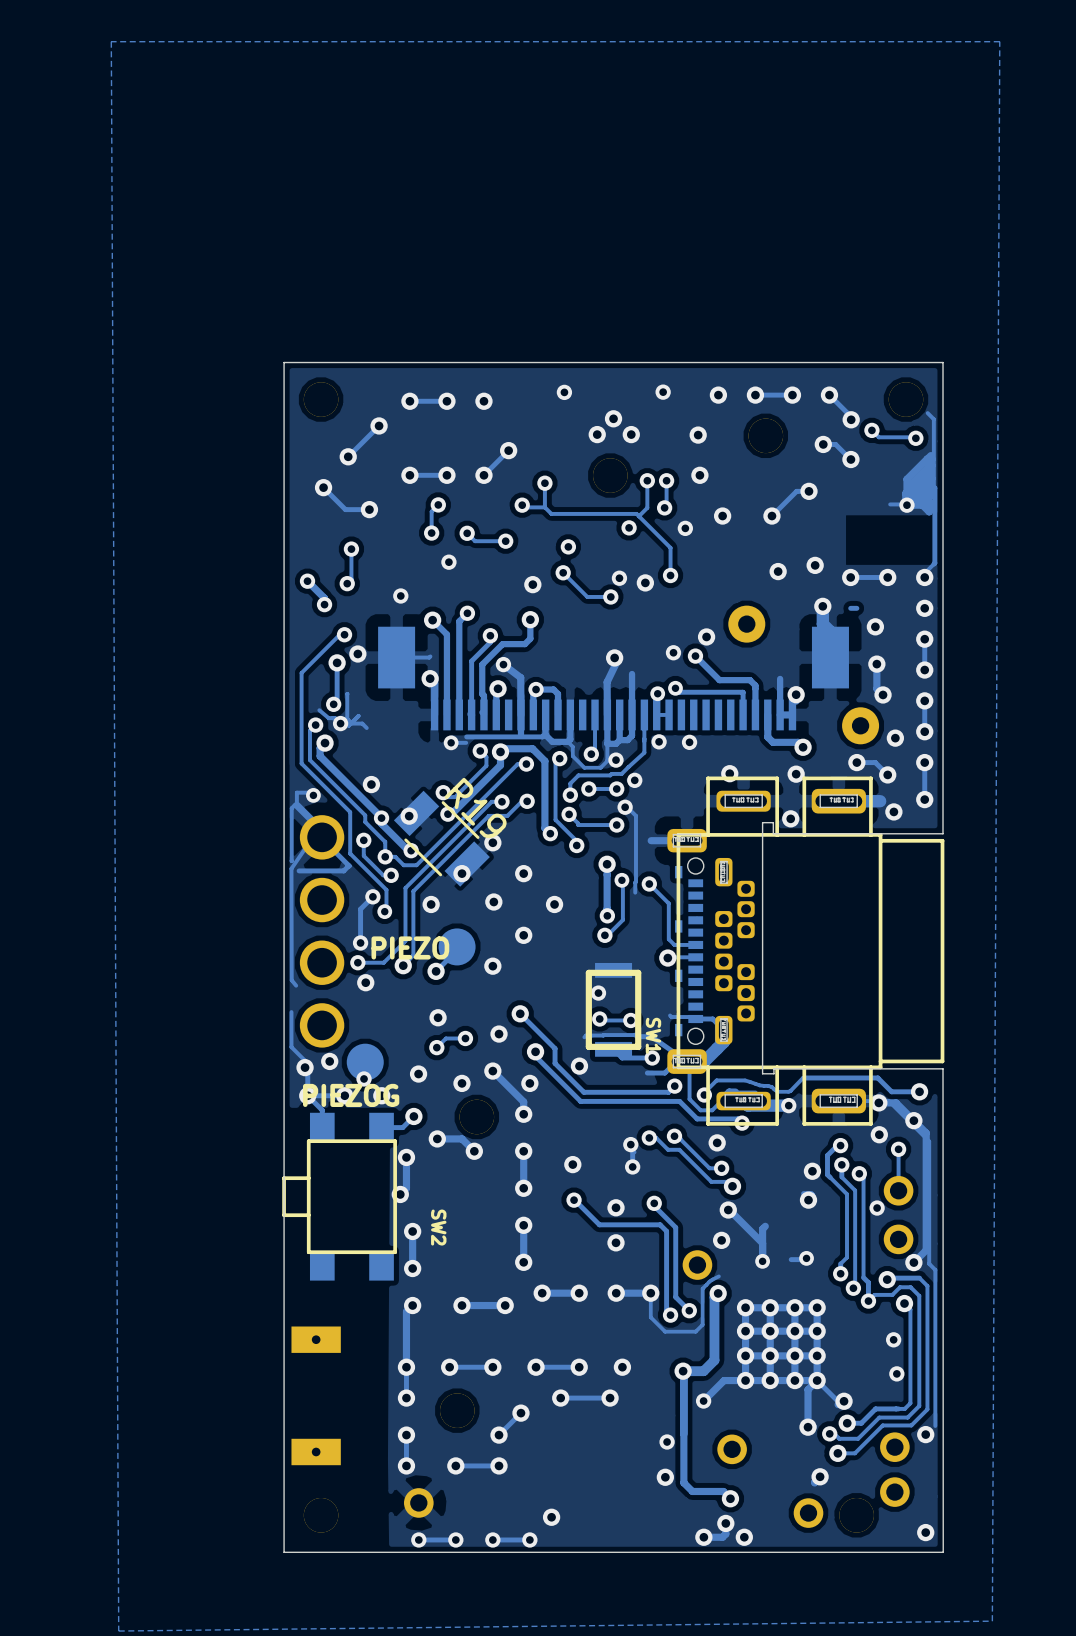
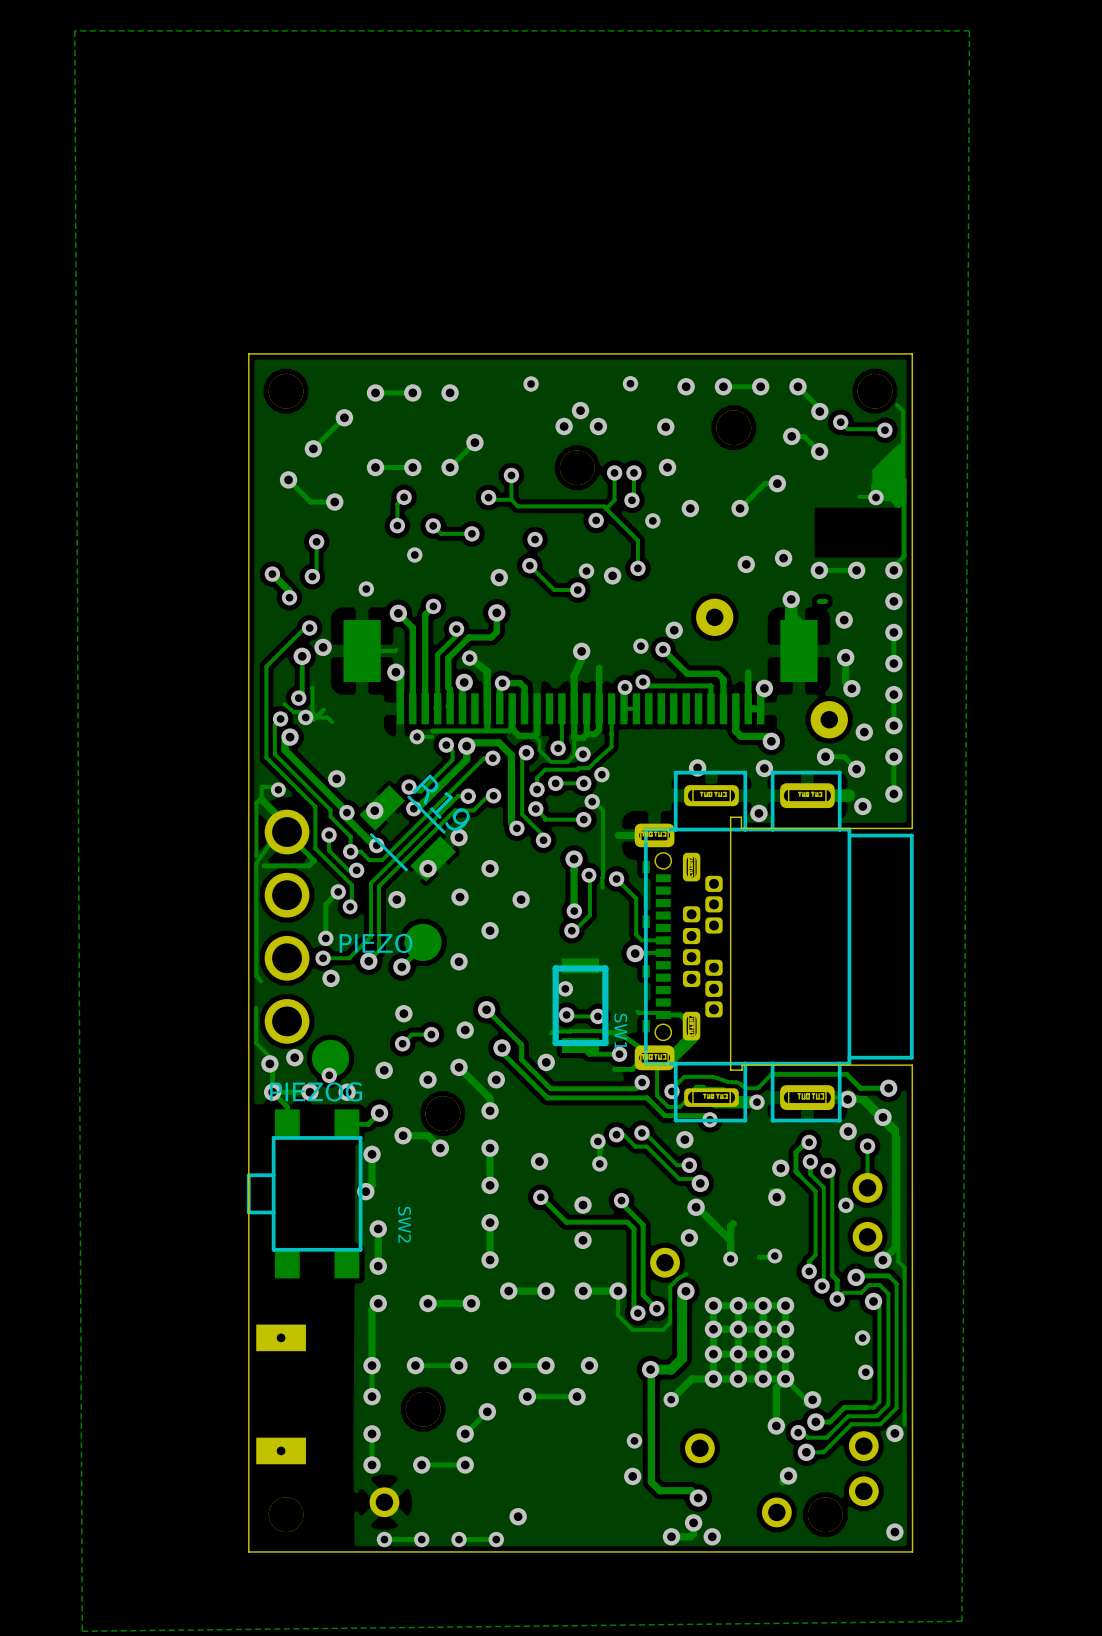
via: (659, 741) -> none
via: (689, 742) -> none

